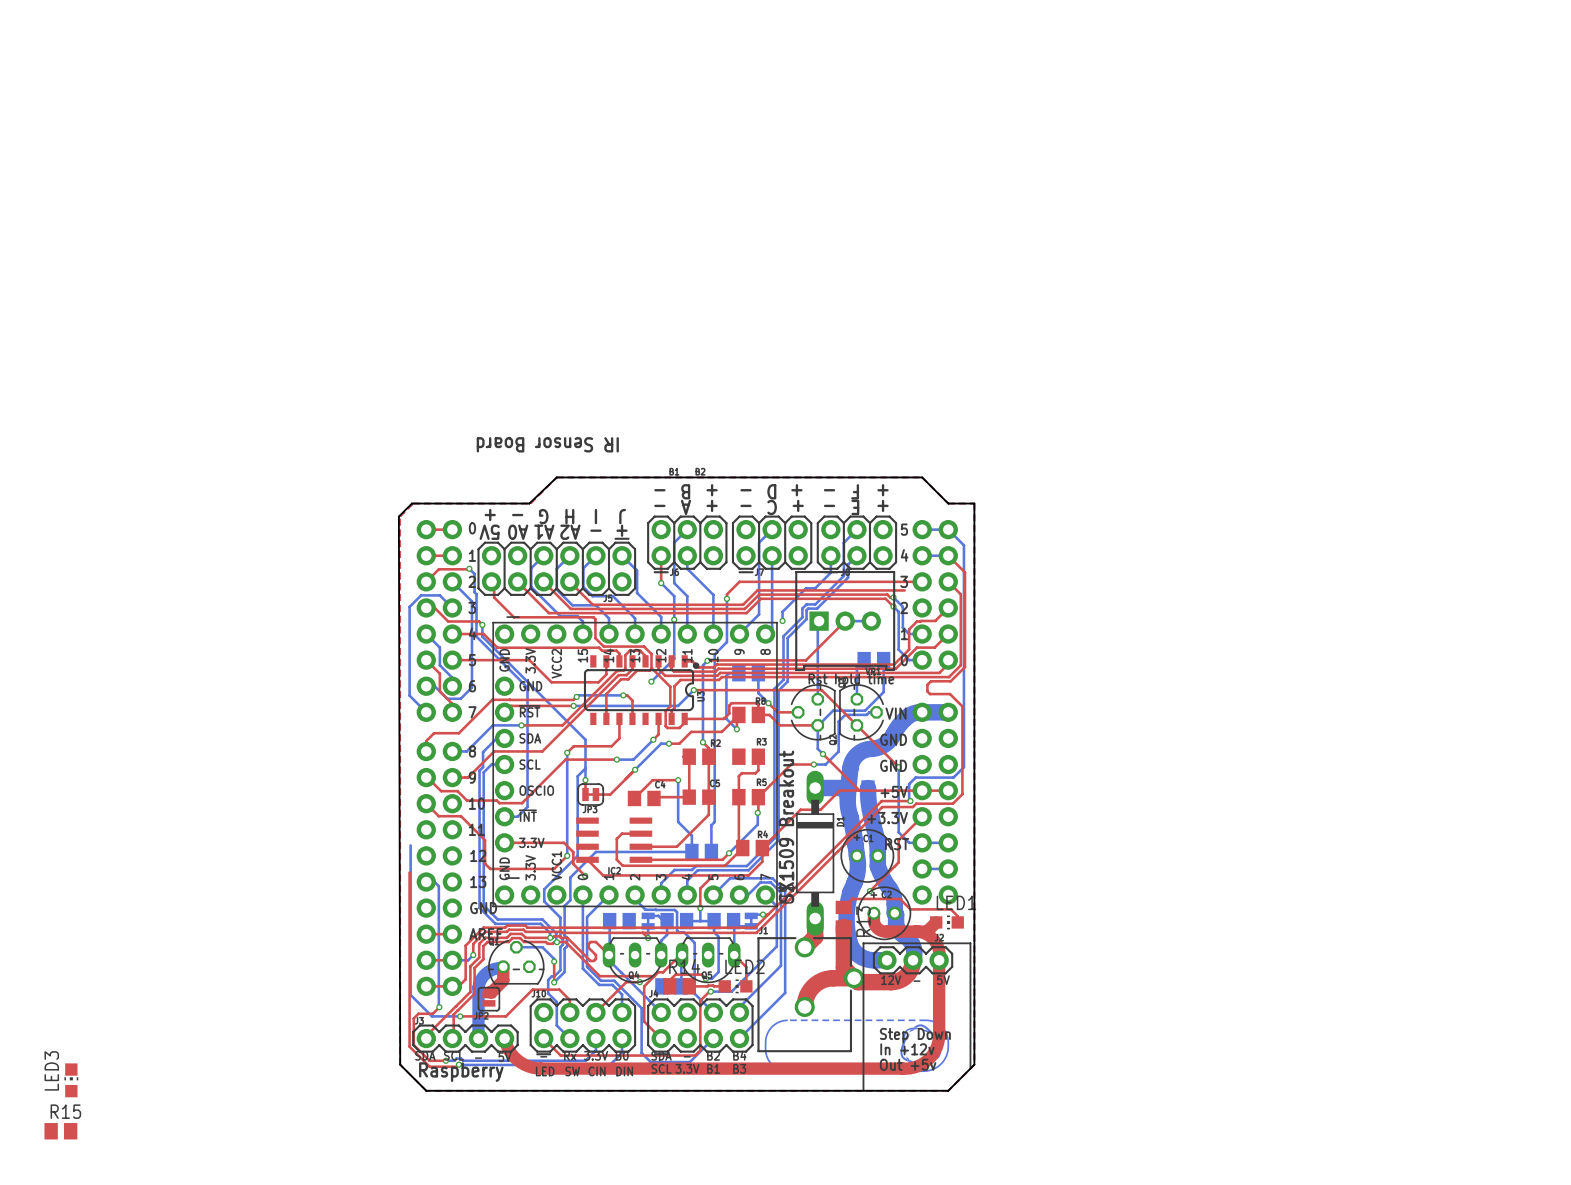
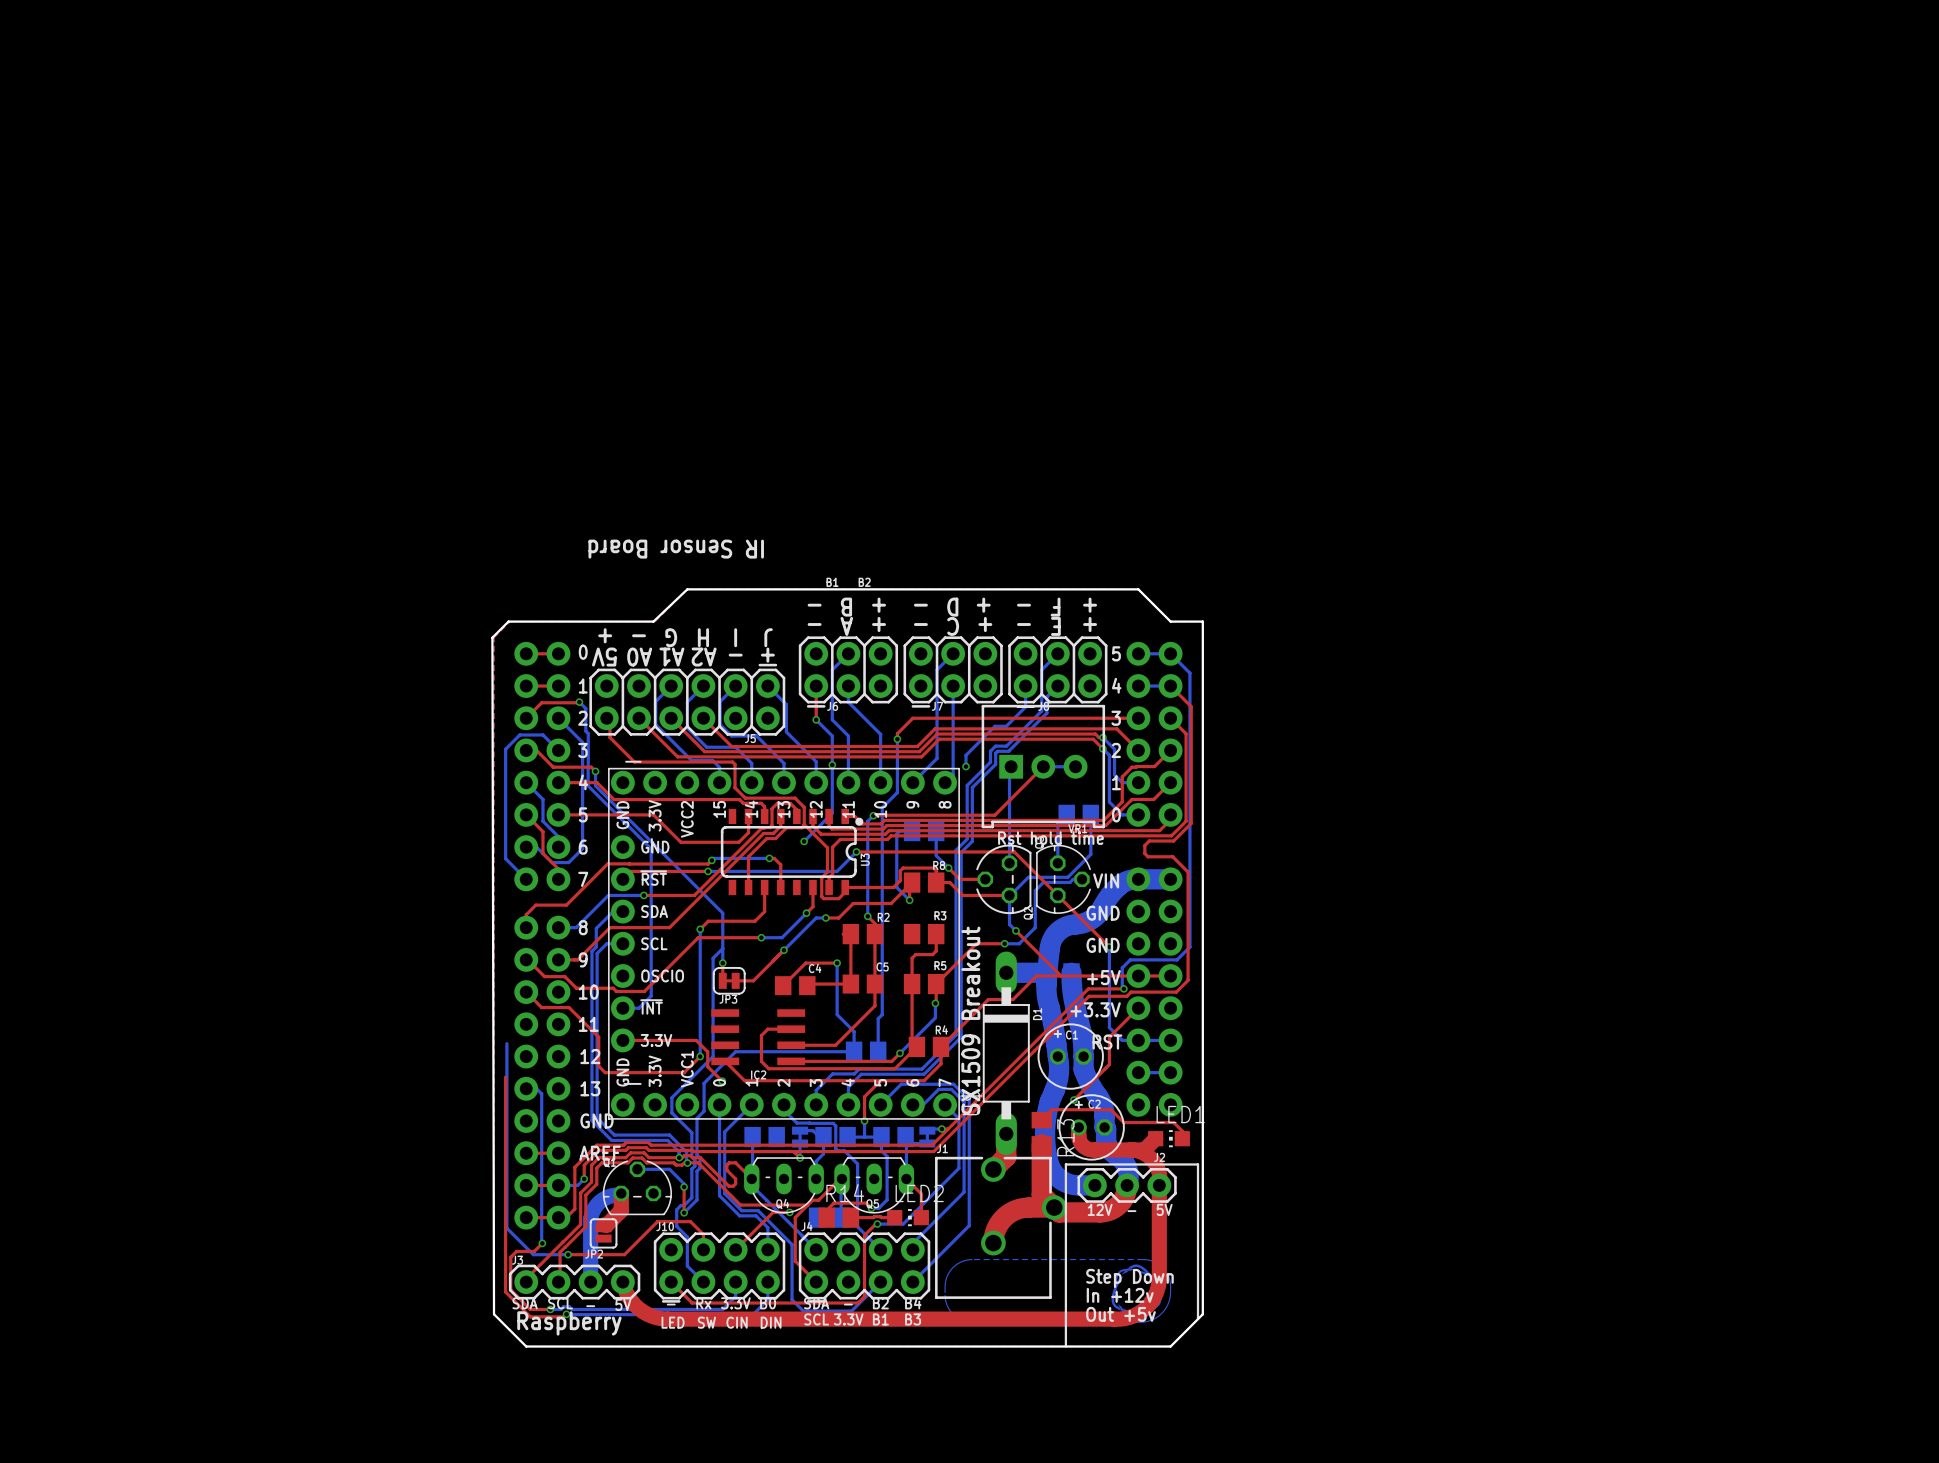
top track: none -> (1116, 728) (1138, 750)
LED3: (71, 1080) -> none
R15: (60, 1131) -> none

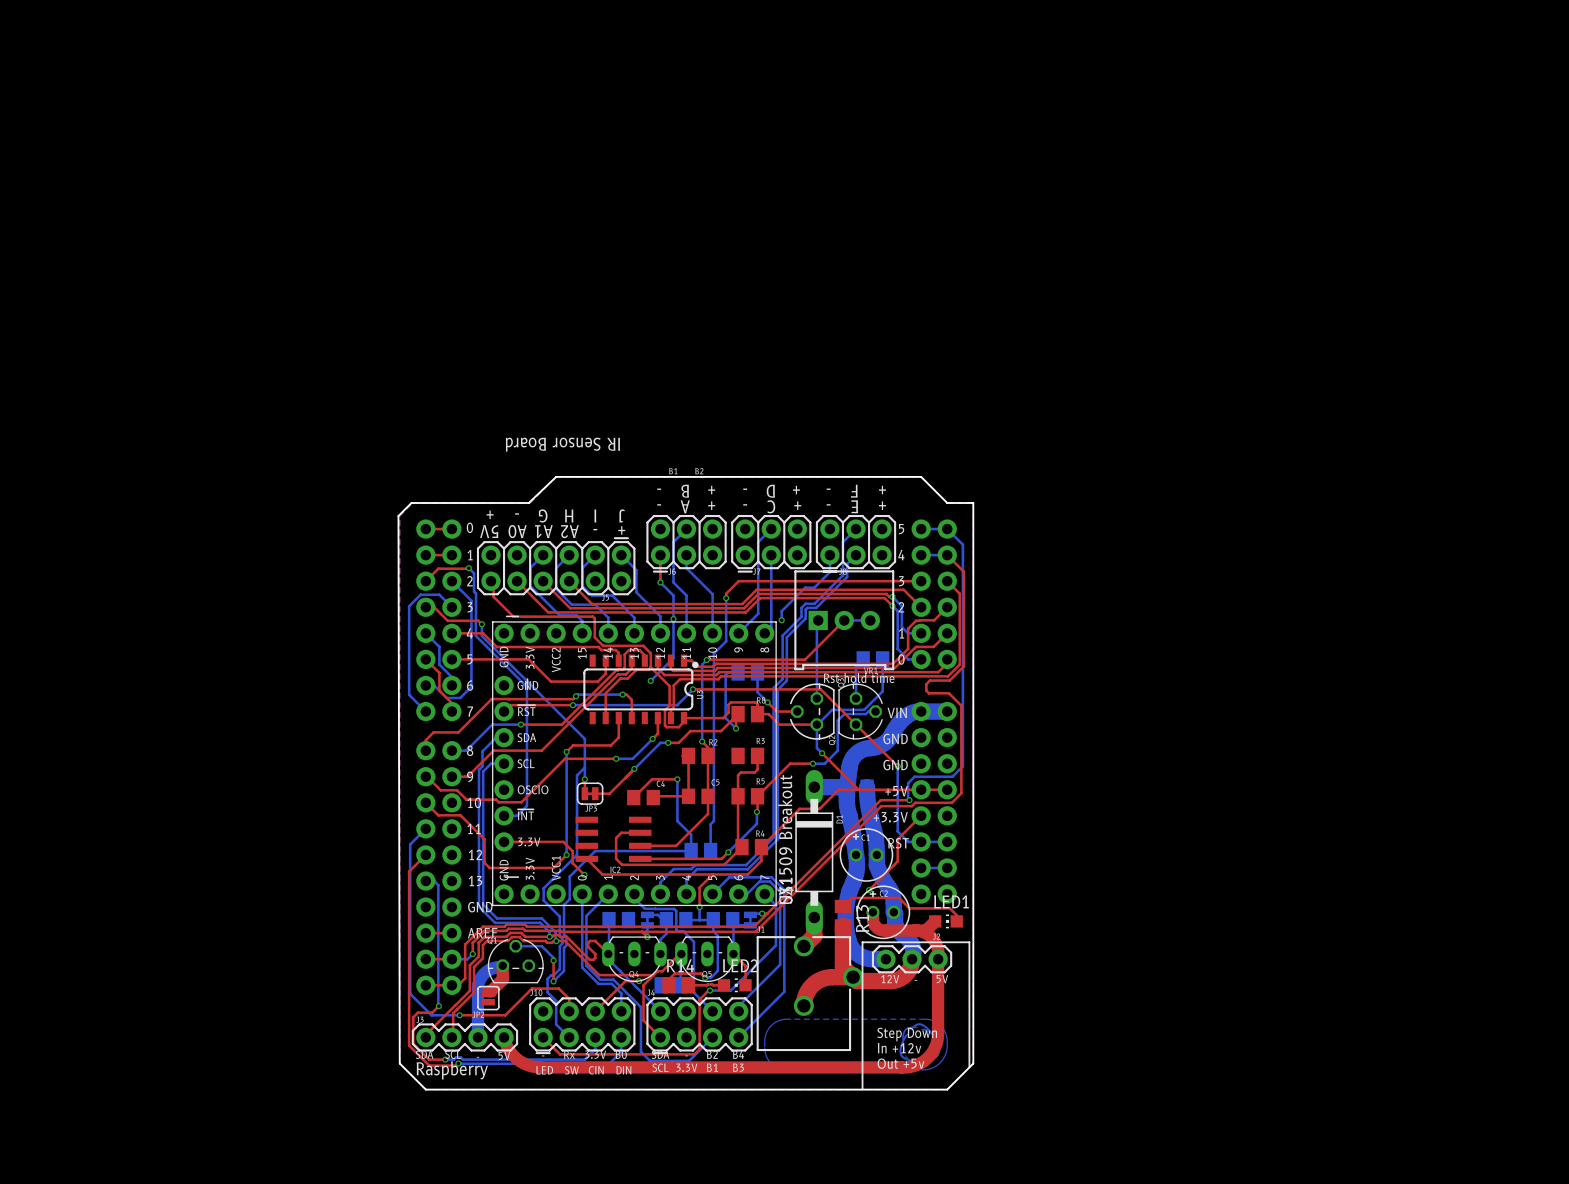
bottom track: none -> (425, 828) (410, 844)
top track: none -> (425, 854) (409, 871)

